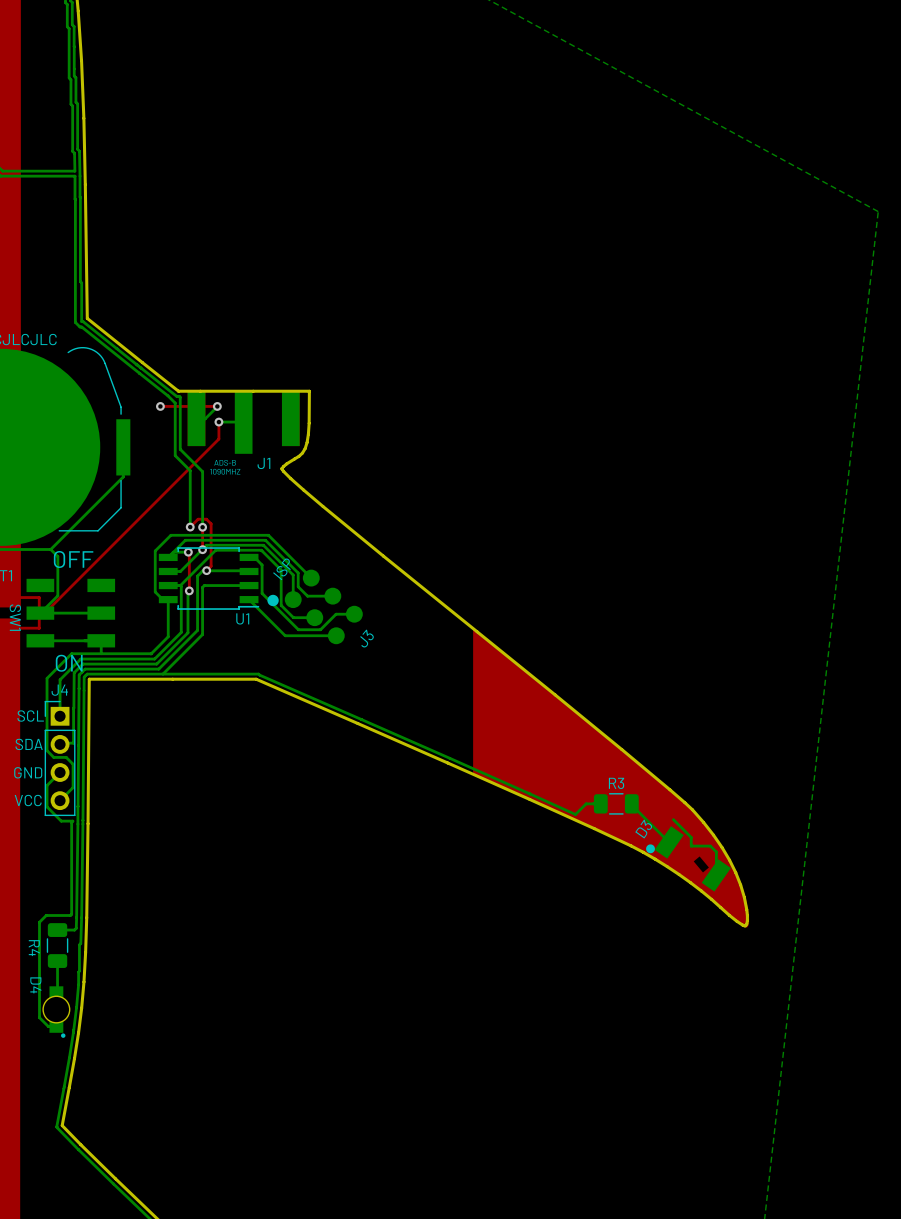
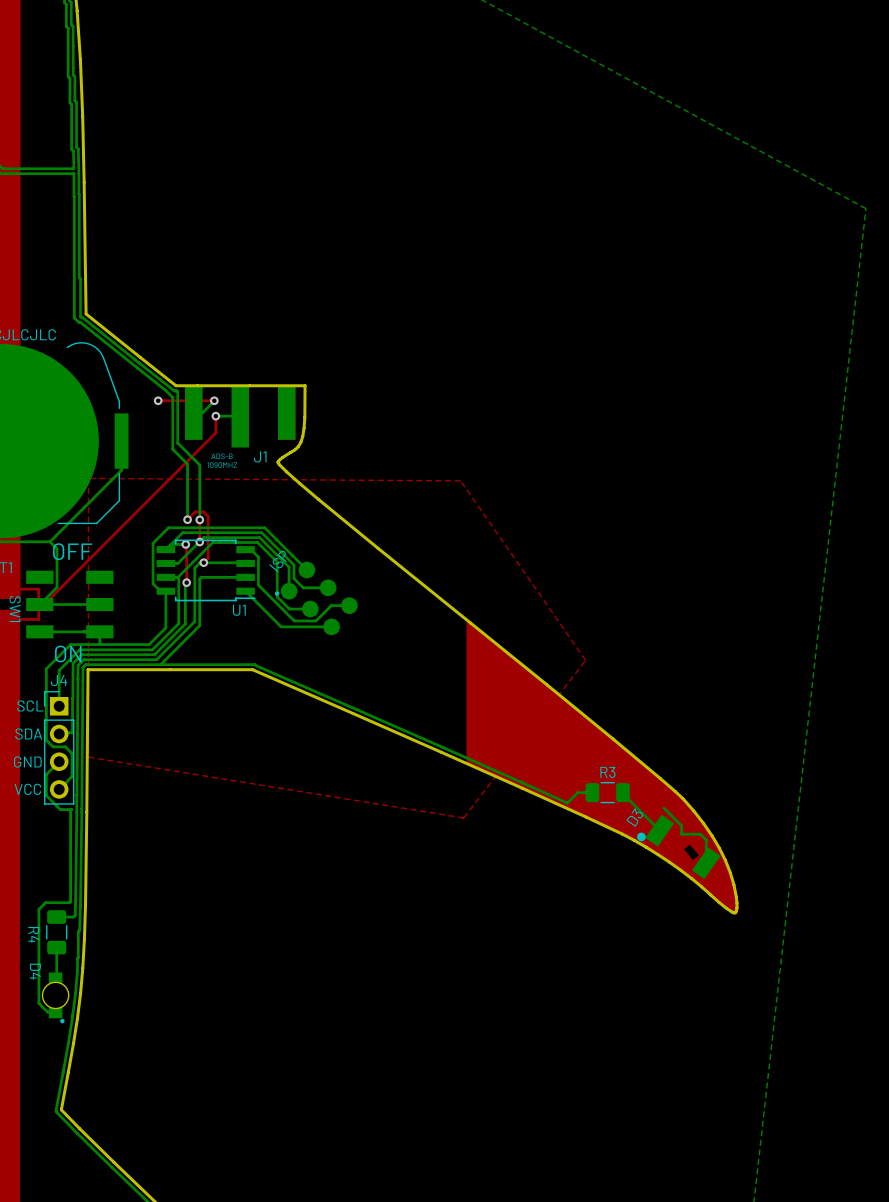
J3: (315, 606) -> none
part: none -> (316, 598)
top zone outline: none -> (463, 817) (88, 757) (88, 478) (460, 480) (585, 660) (463, 817)

